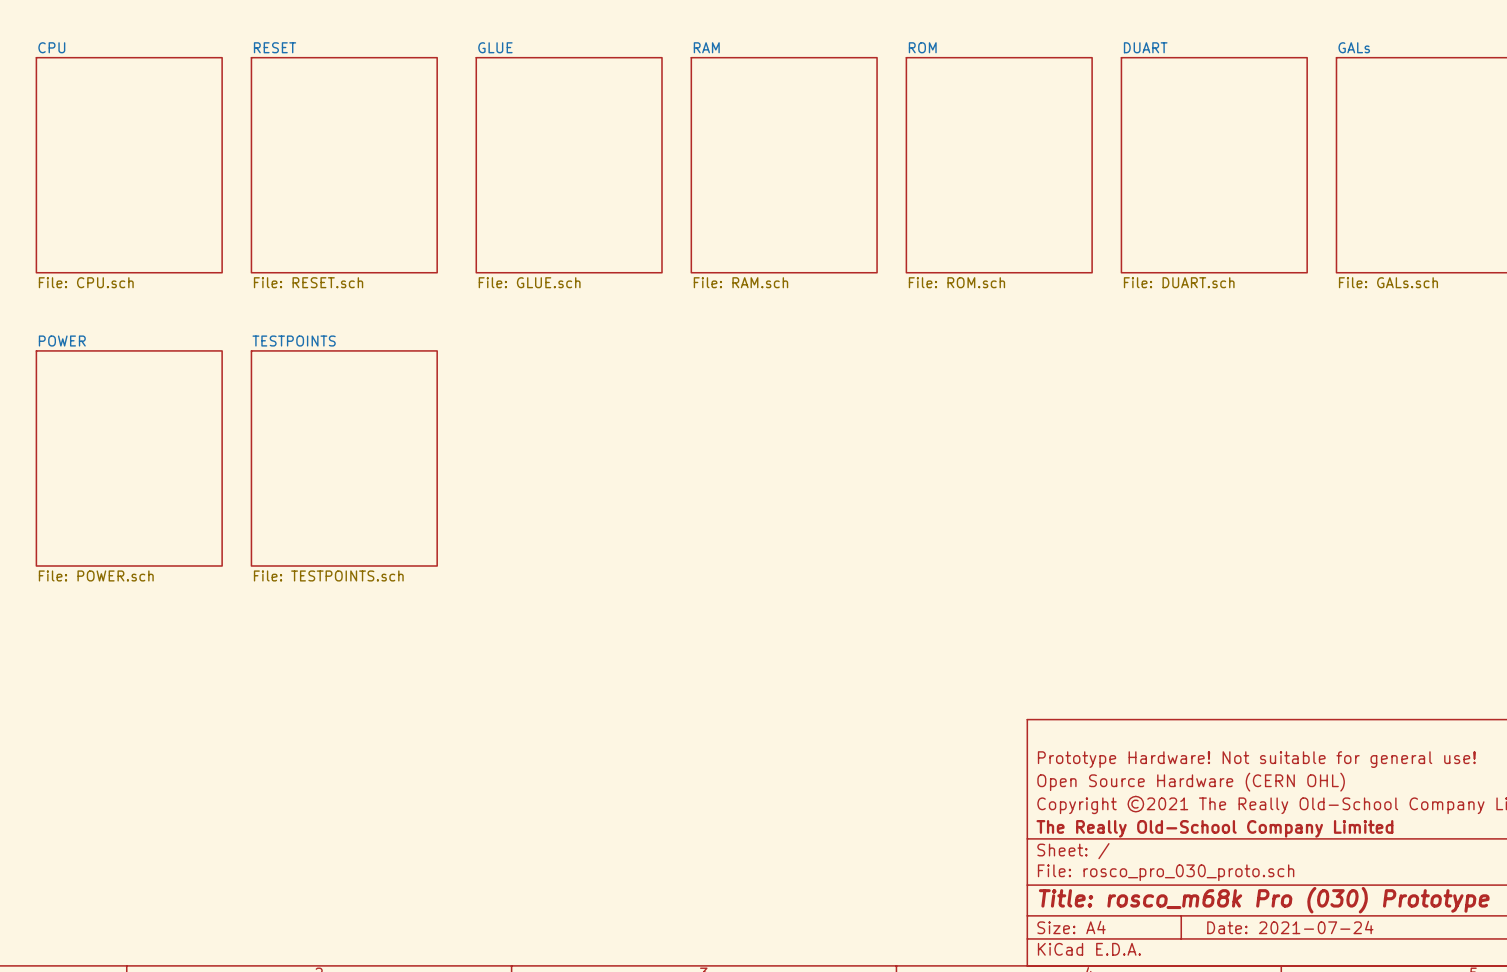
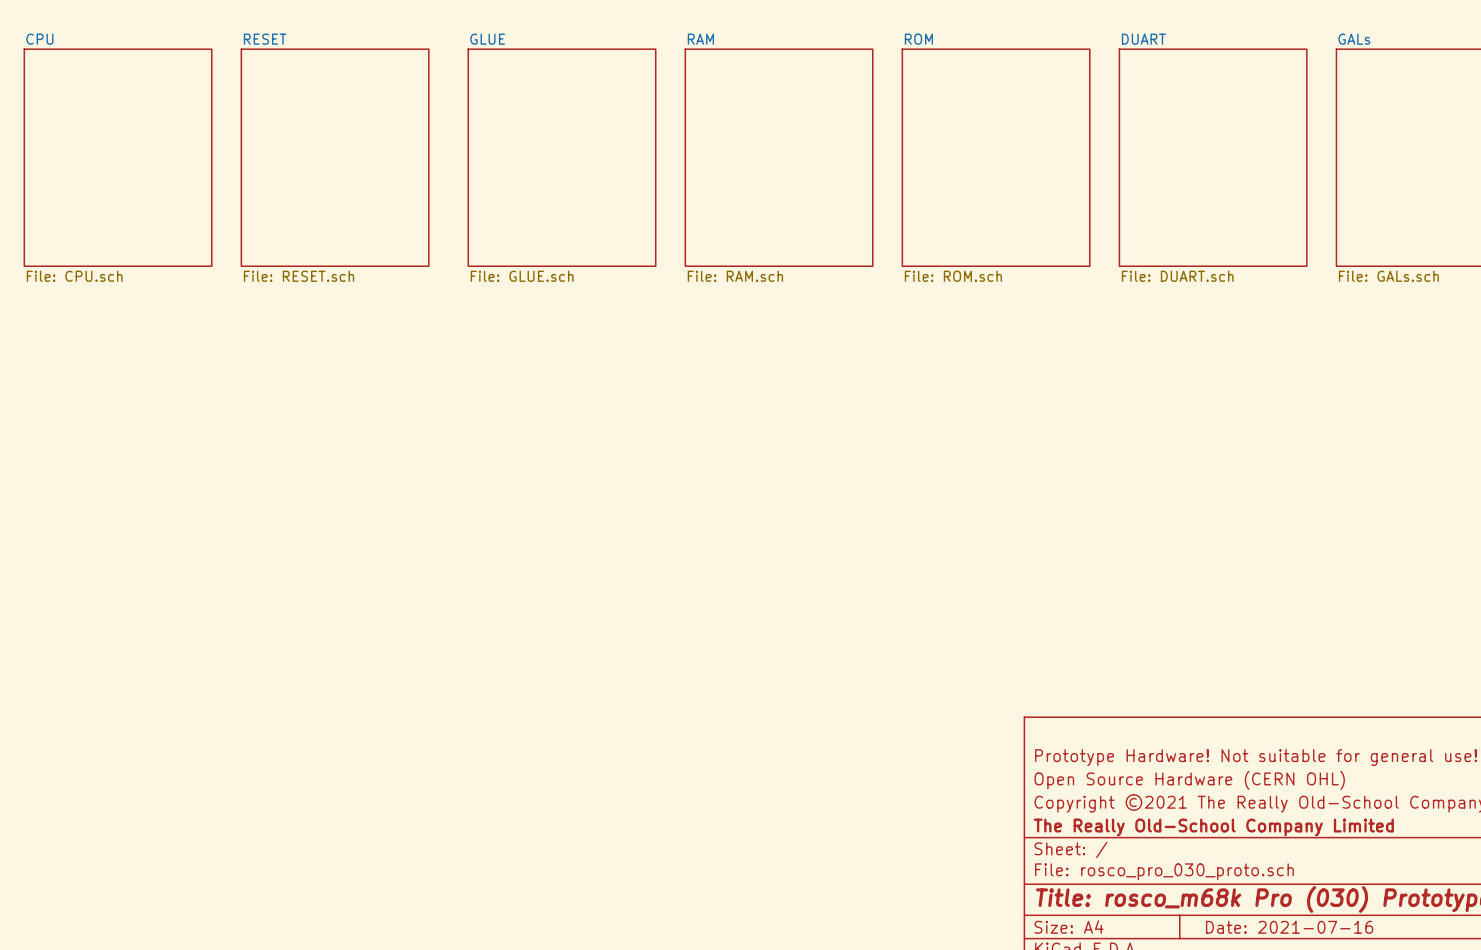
sheet POWER: File: POWER.sch (129, 458) -> none
sheet TESTPOINTS: File: TESTPOINTS.sch (344, 458) -> none
title block: Date: 2021-07-24 (1290, 927) -> Date: 2021-07-16 (1289, 927)

